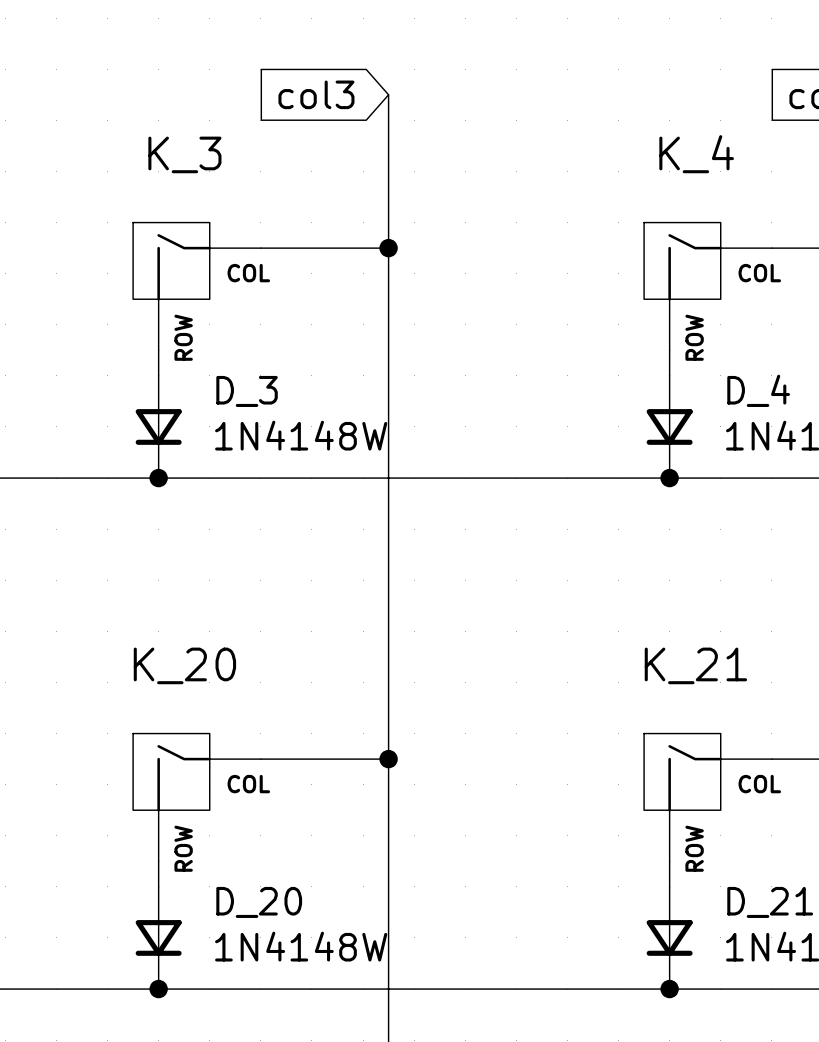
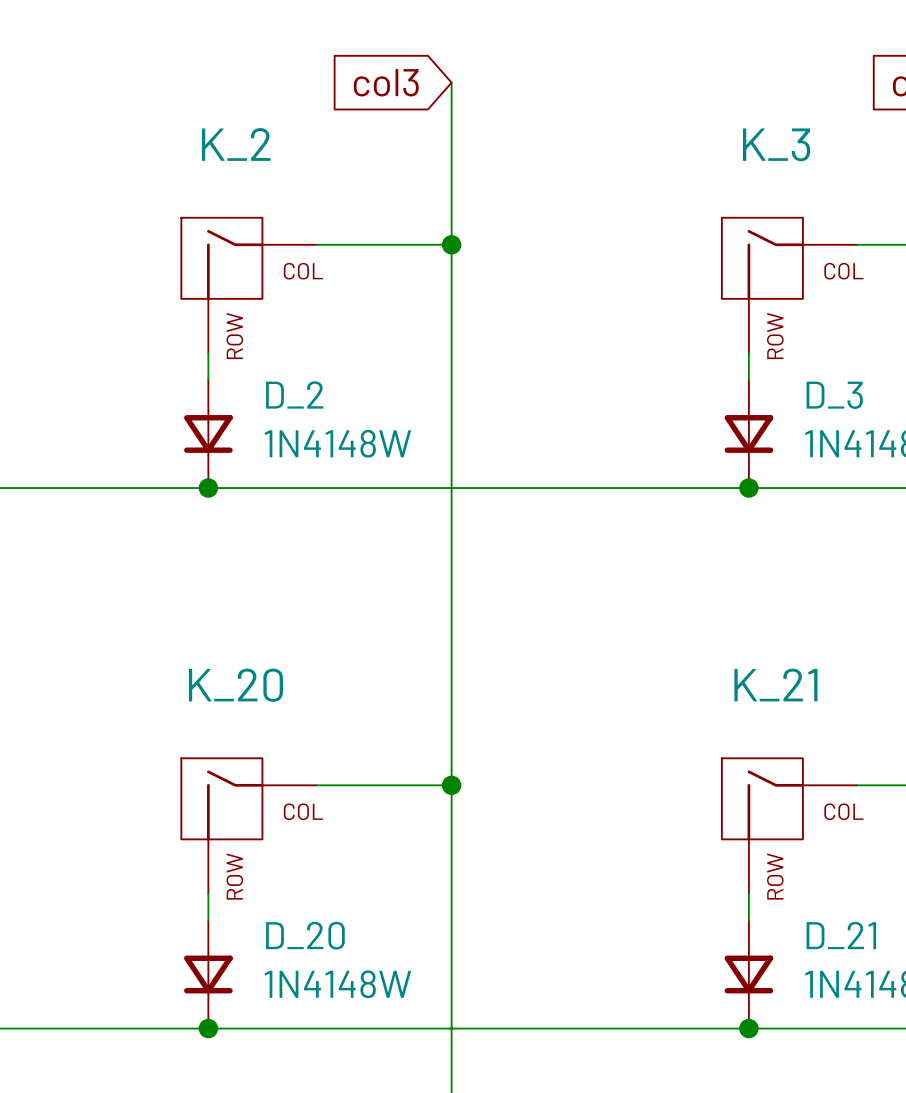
K_3 name: K_3 (184, 154) -> K_2 (236, 144)
K_4 name: K_4 (696, 154) -> K_3 (776, 144)
D_4 name: D_4 (758, 390) -> D_3 (834, 395)
D_3 name: D_3 (247, 391) -> D_2 (294, 394)

